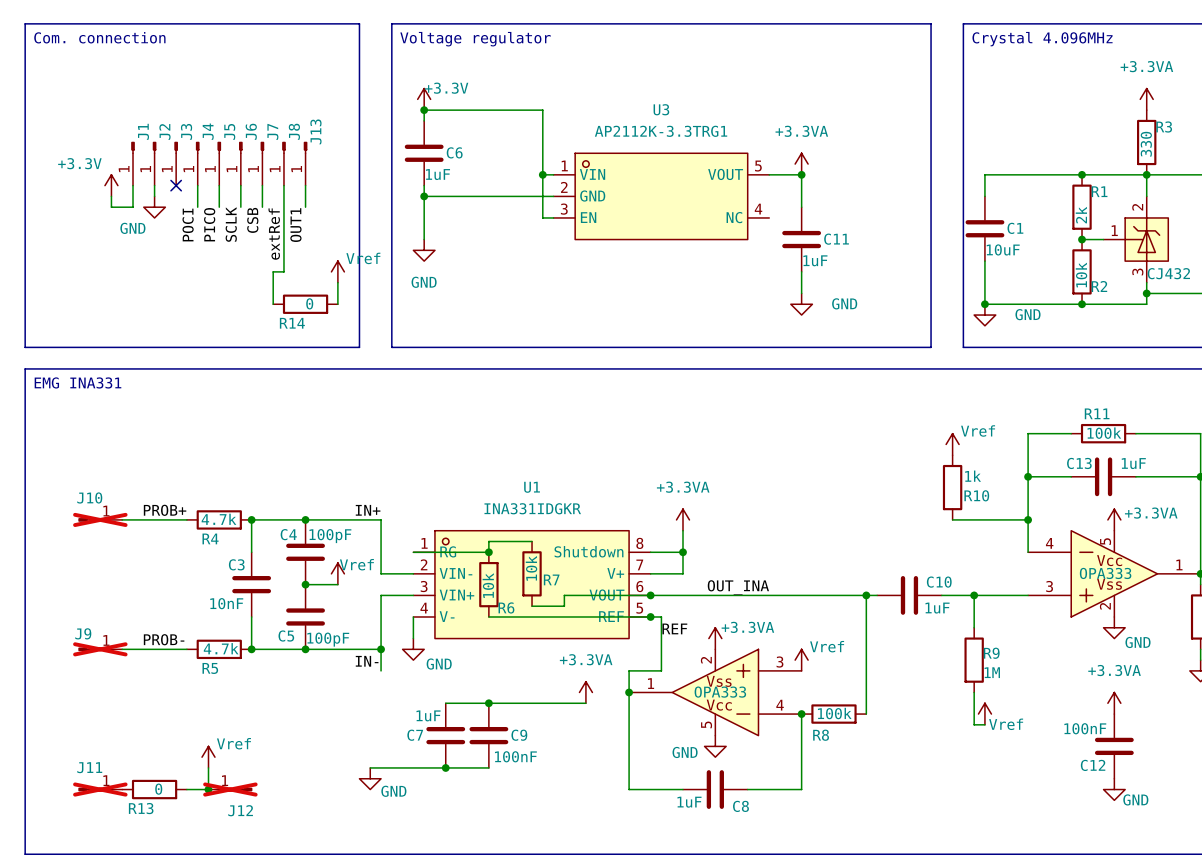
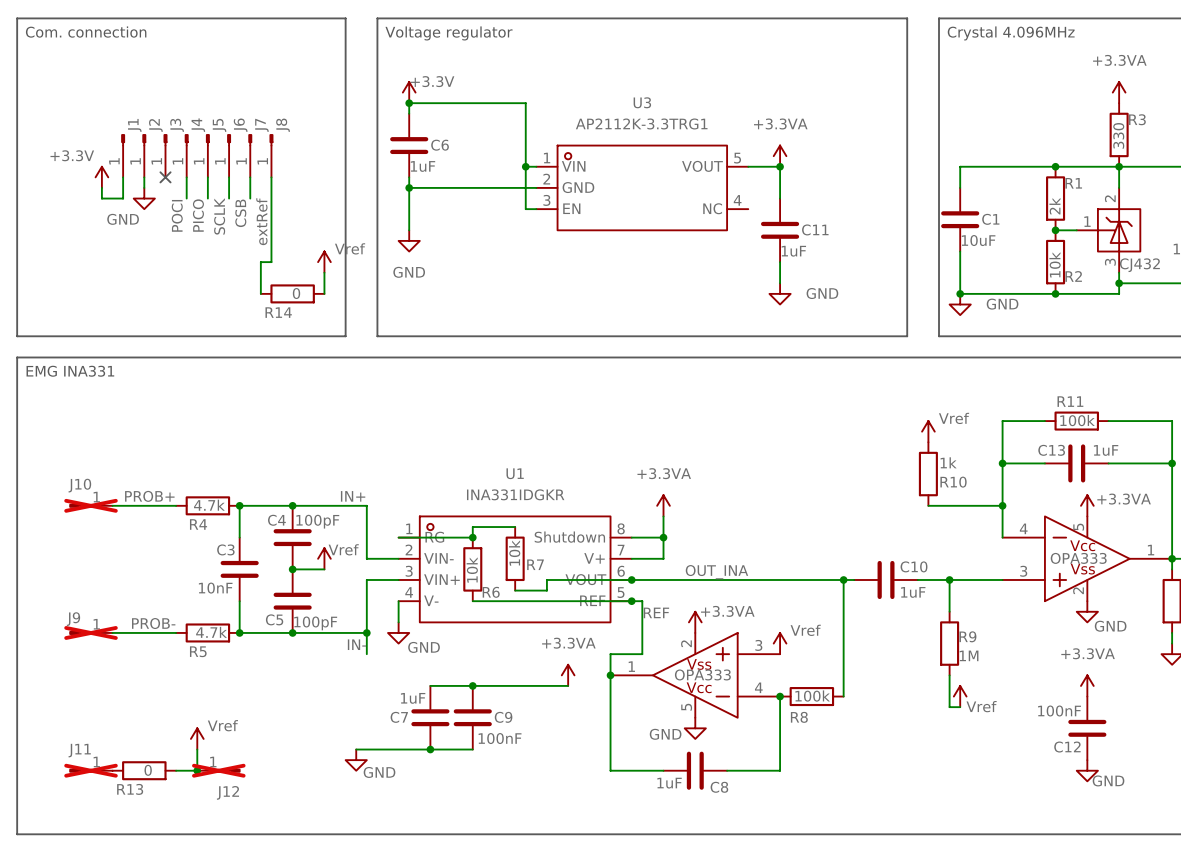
J13: (305, 163) -> none
wire: (305, 185) (305, 207) -> none
label: OUT1 (295, 225) -> none

